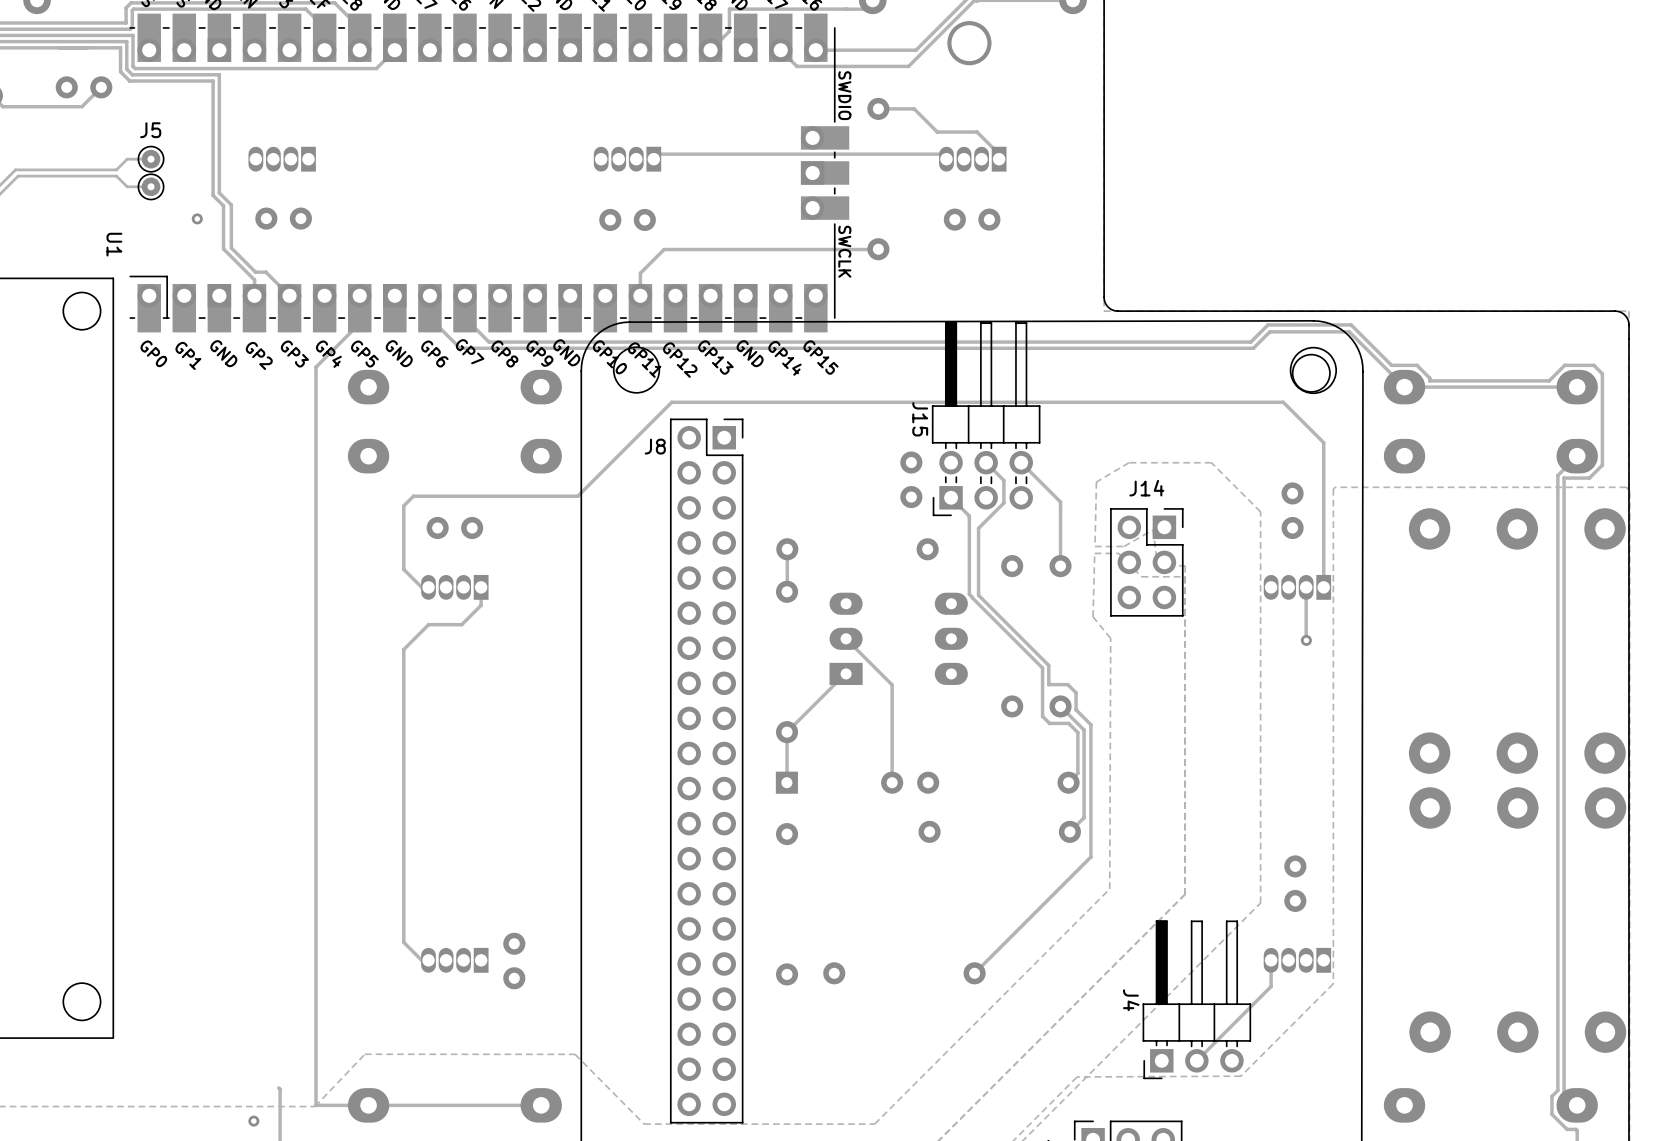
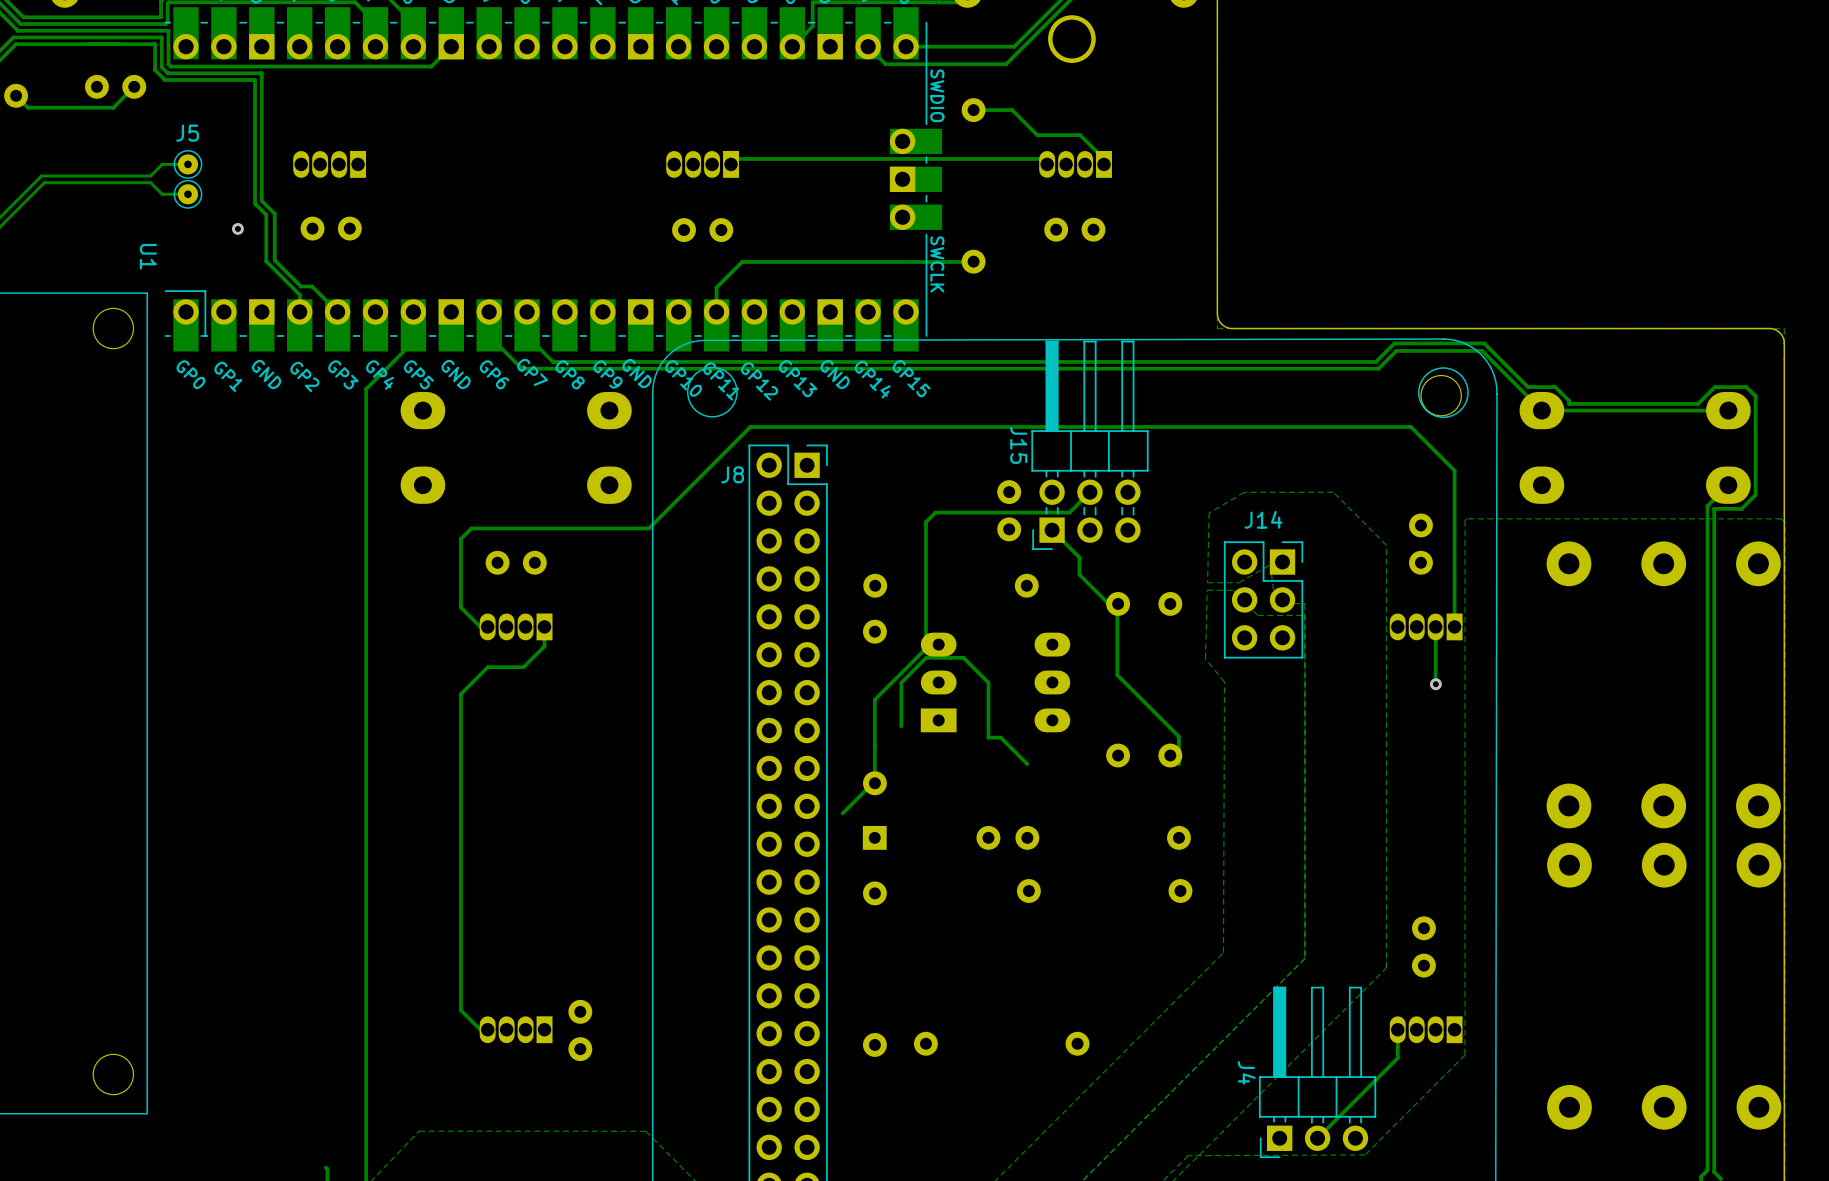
track: (986, 462) (1003, 480) (1003, 502) (978, 528) (978, 595) (1048, 665) (1048, 684) (1067, 684) (1076, 692) (1076, 709) (1090, 724) (1090, 857) (974, 973) -> (1089, 492) (1069, 512) (935, 512) (925, 522) (925, 648) (874, 699) (874, 781) (842, 813)
track: (1021, 462) (1060, 501) (1060, 566) -> none
track: (969, 516) (969, 594) (1042, 668) (1042, 716) (1049, 723) (1068, 723) (1077, 732) (1077, 773) (1068, 782) -> (1071, 549) (1079, 557) (1079, 574) (1117, 612) (1117, 675) (1178, 736) (1178, 764)
track: (787, 549) (787, 591) -> none
track: (846, 638) (892, 684) -> (901, 726) (901, 682) (926, 657) (963, 657) (988, 682) (988, 732)
track: (846, 673) (787, 732) (787, 782) -> none
track: (892, 689) (892, 782) -> (988, 737) (1000, 737) (1027, 764)
track: (1060, 706) (1084, 730) (1084, 817) (1069, 831) -> none

